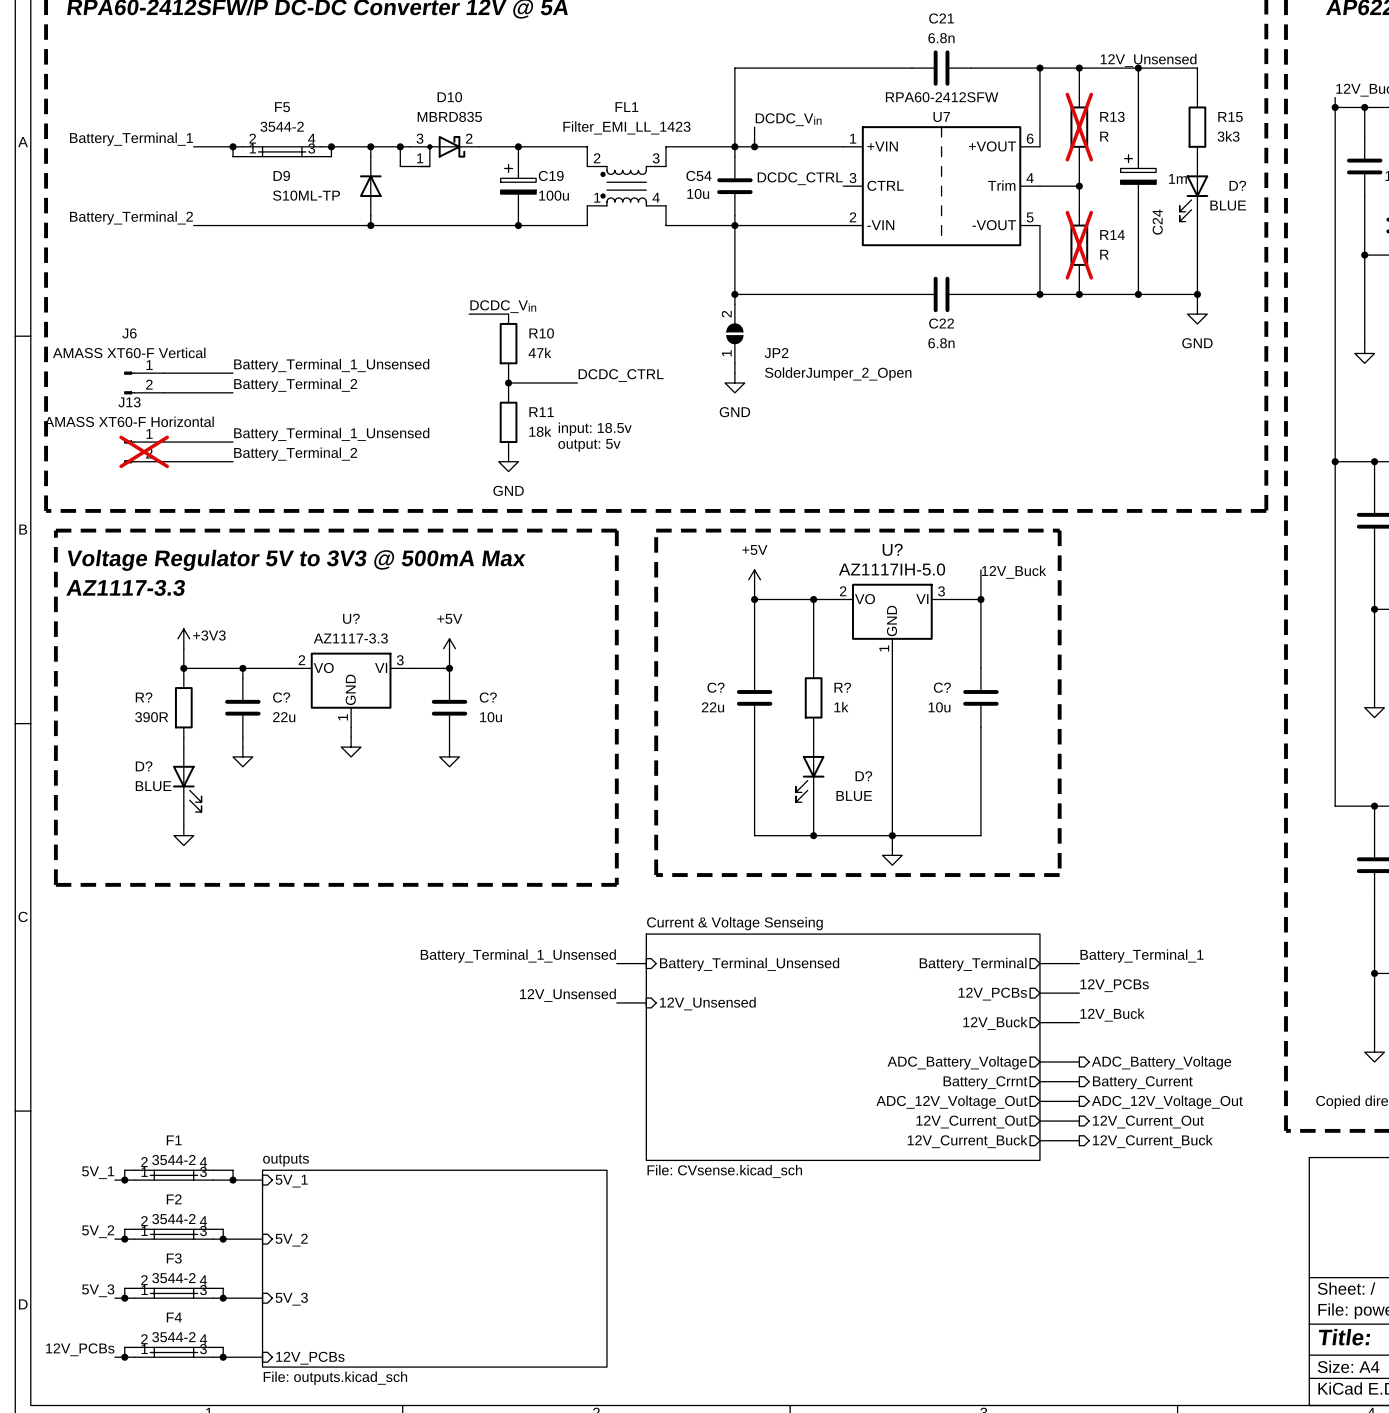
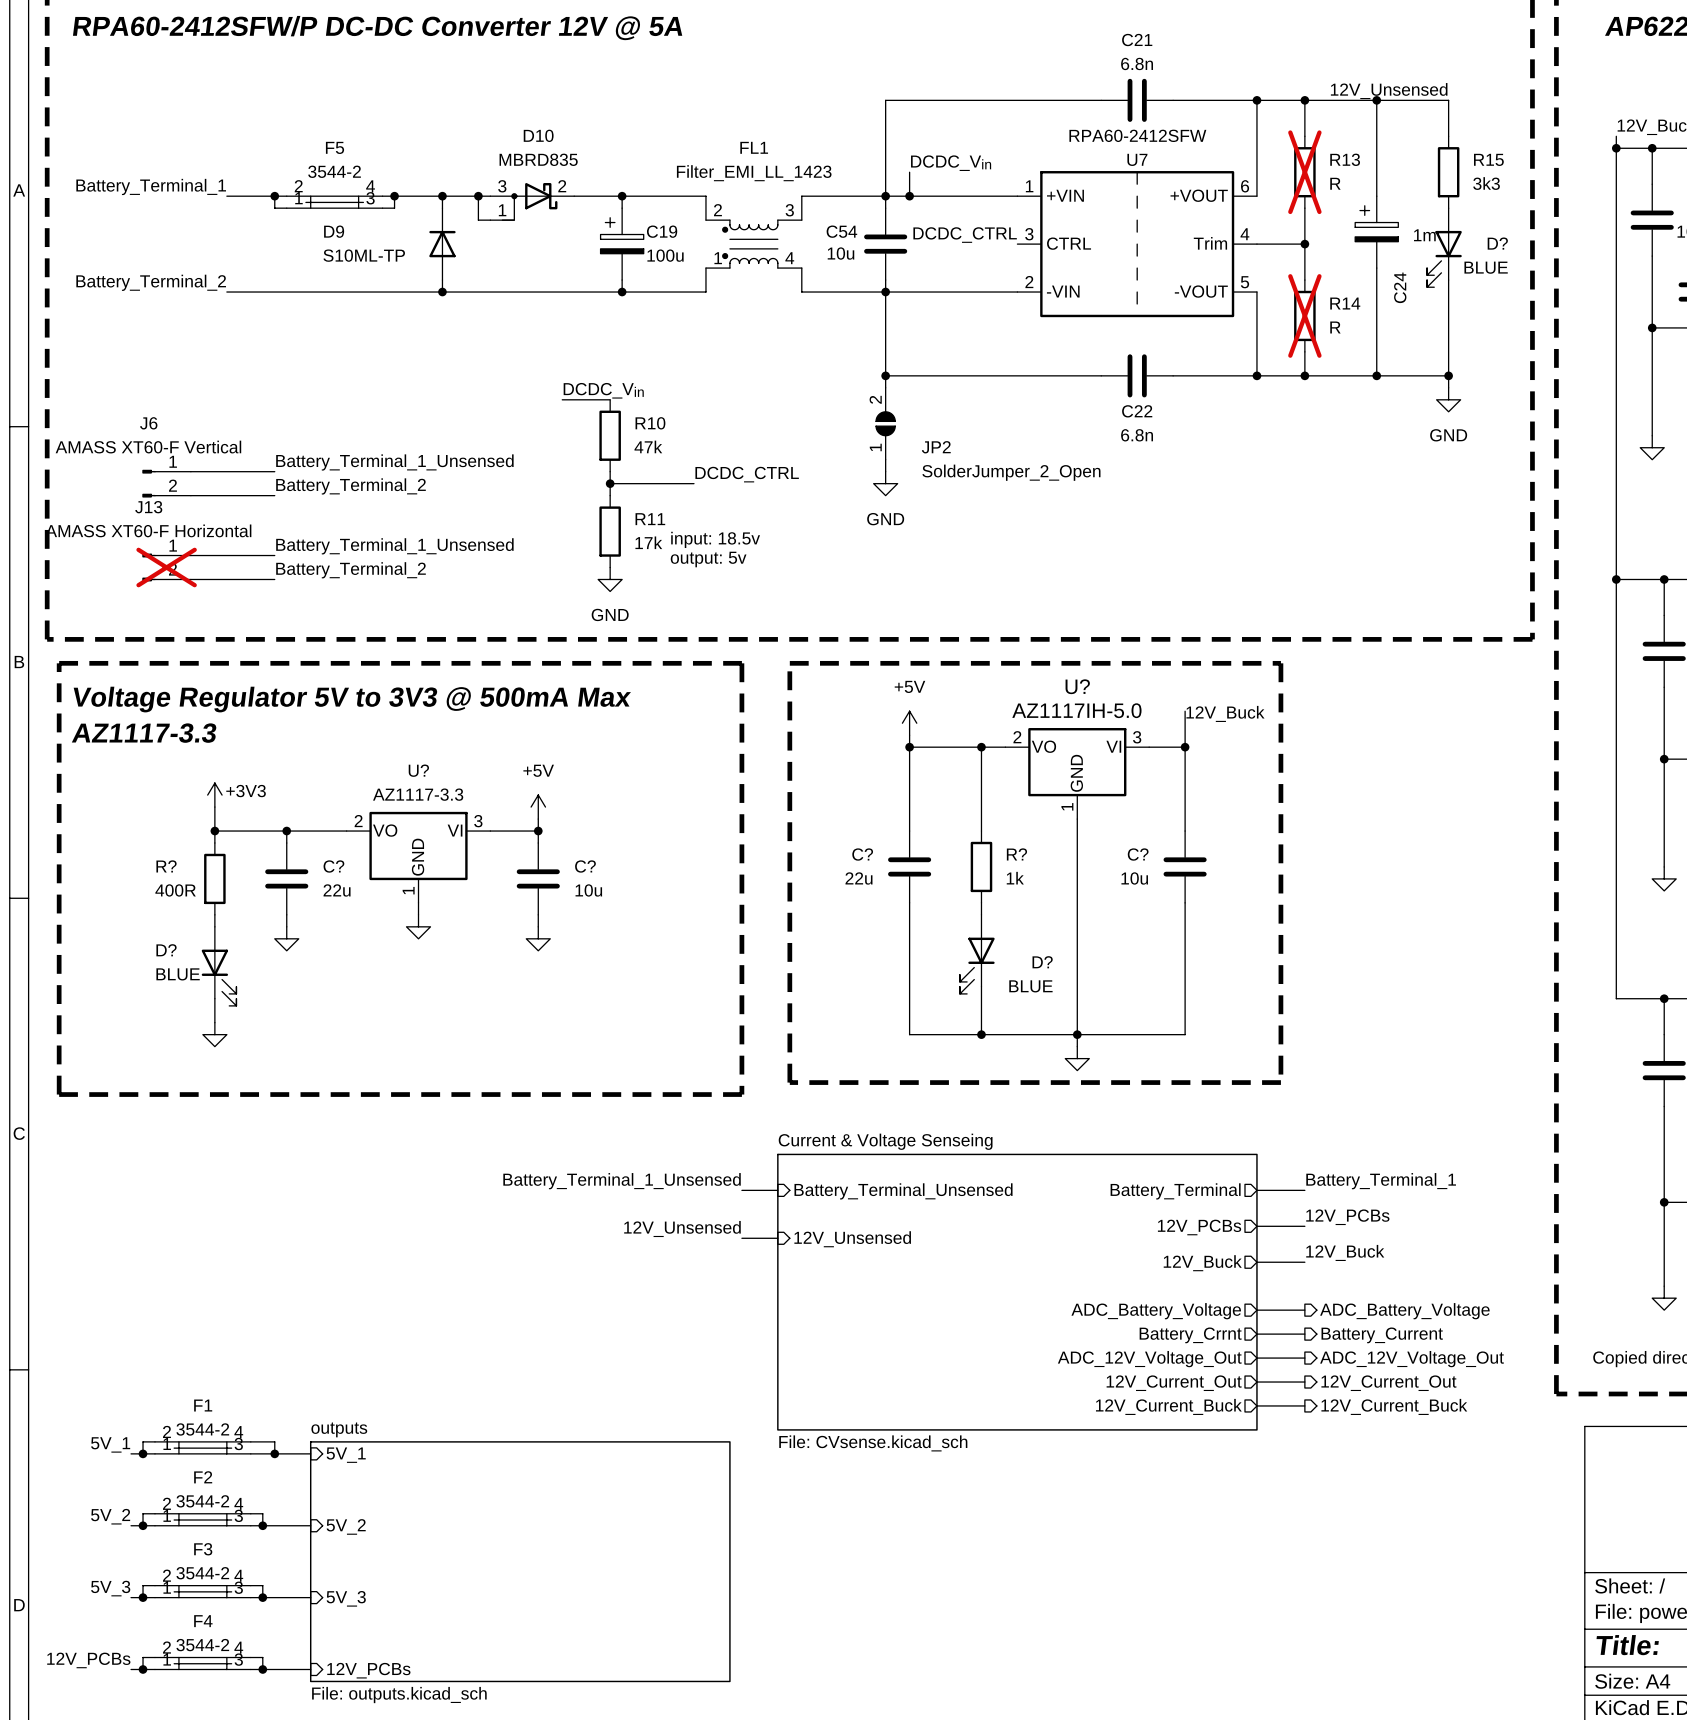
R11 value: 18k (540, 431) -> 17k (648, 542)
R? value: 390R (151, 717) -> 400R (175, 890)

